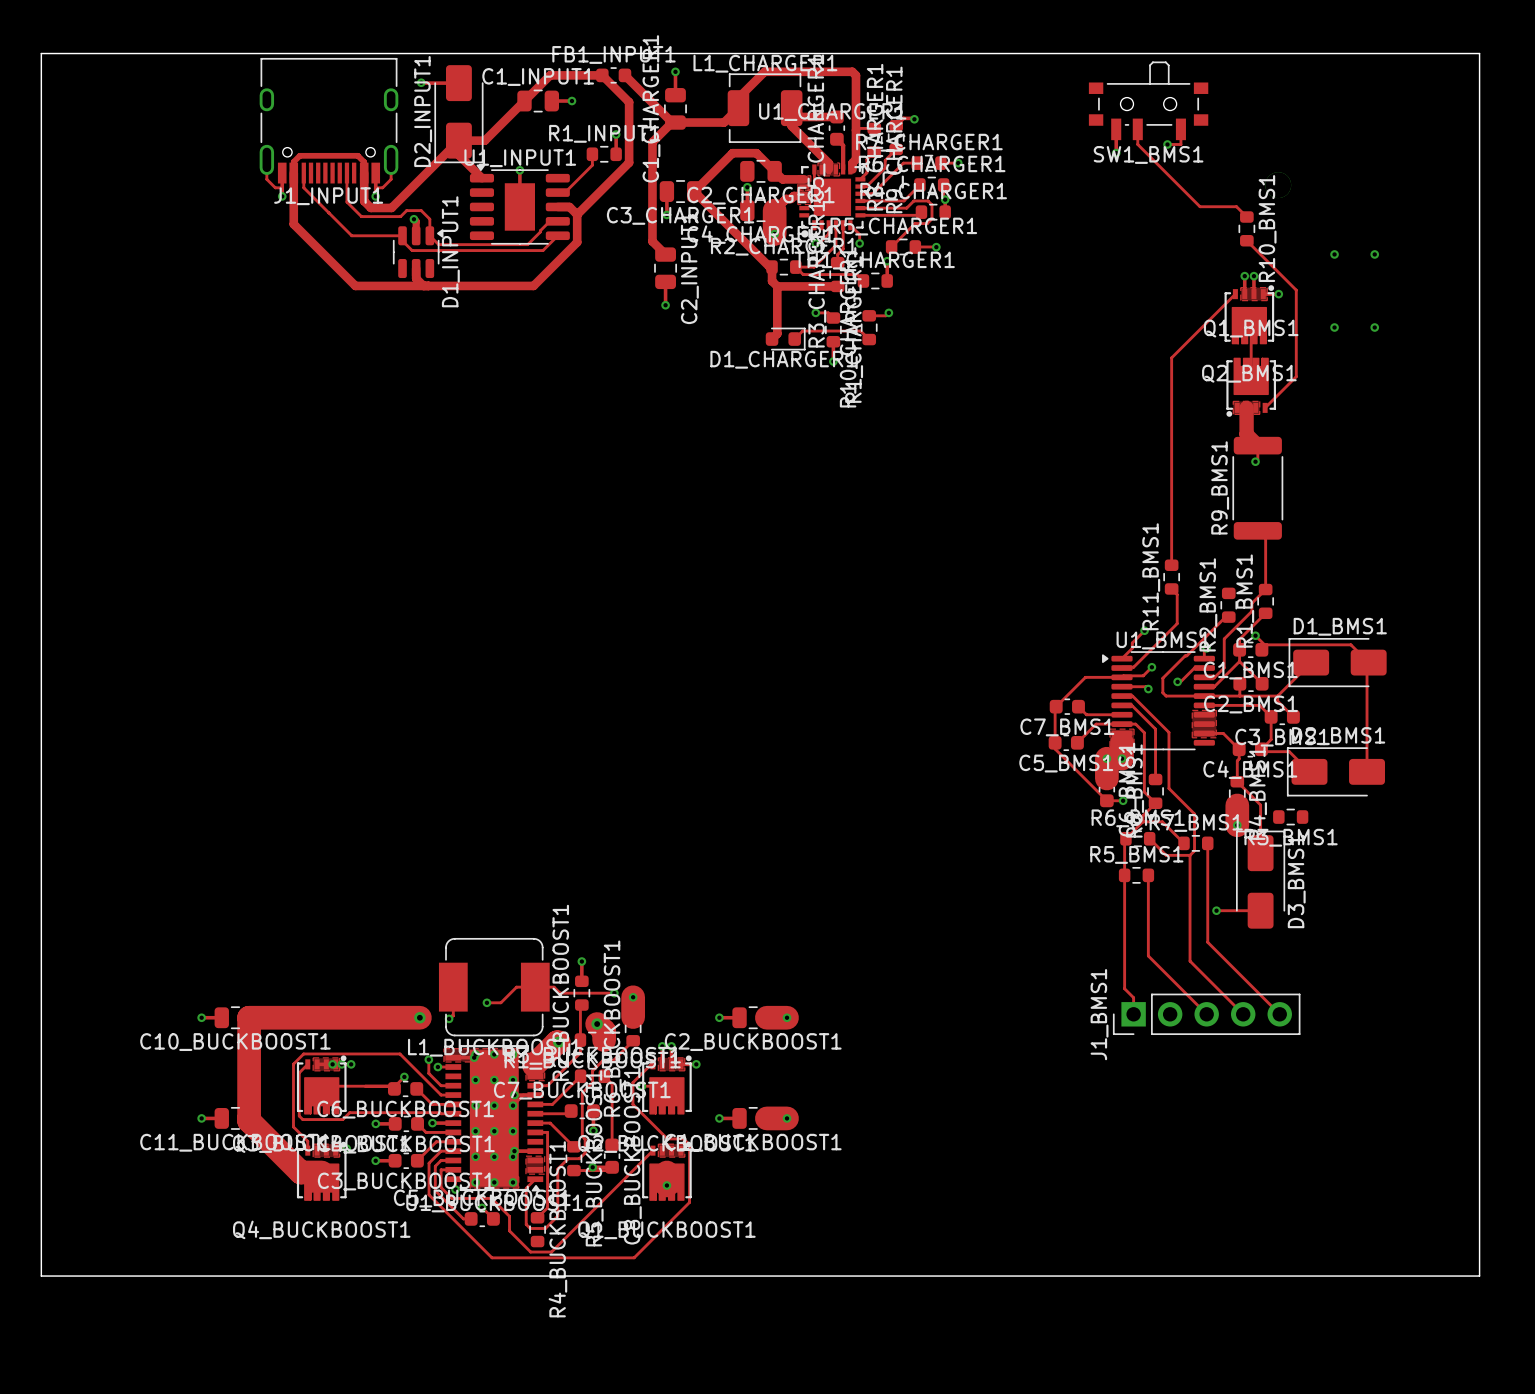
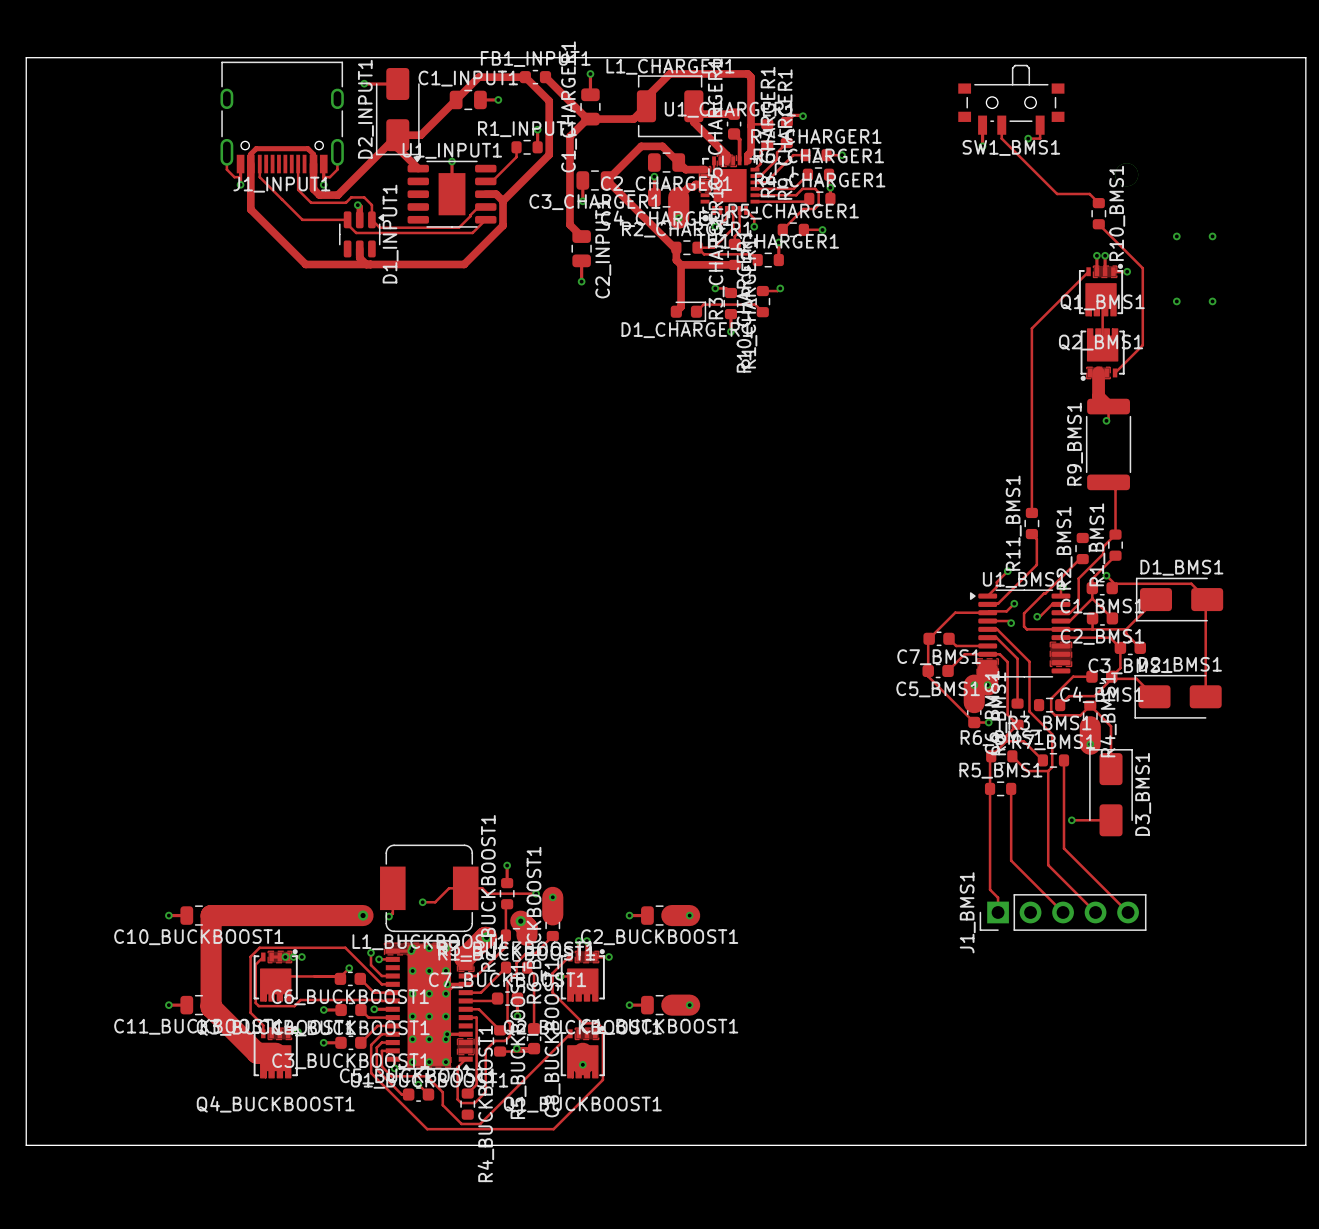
track: (1204, 733) (1223, 733) (1239, 749) (1237, 781) -> (1091, 676) (1073, 676) (1051, 698) (1051, 711) (1055, 715) (1080, 715) (1090, 705)
track: none -> (1111, 678) (1094, 696) (1069, 696) (1060, 705)
R3_BMS1 position: (1290, 817) -> (1049, 705)

